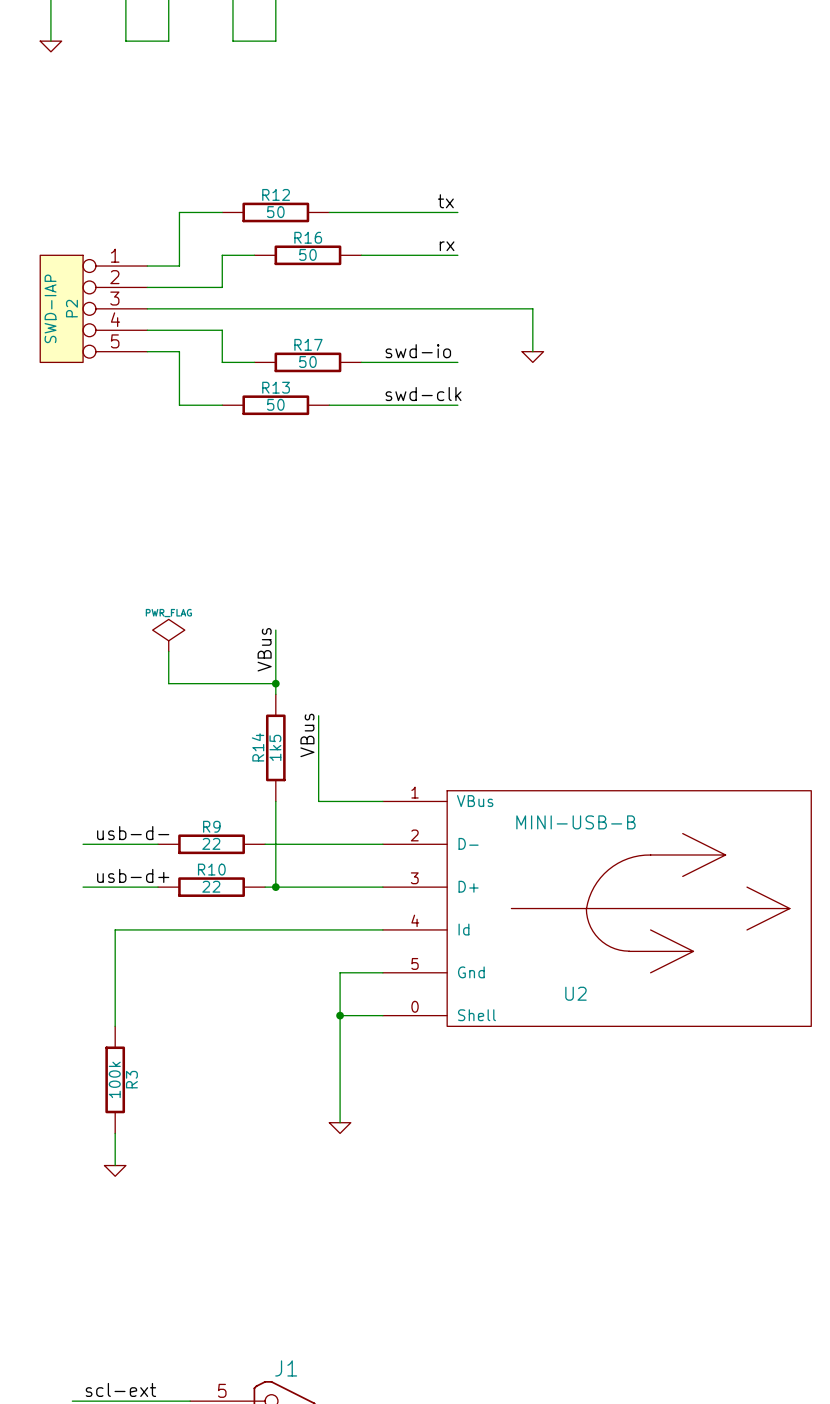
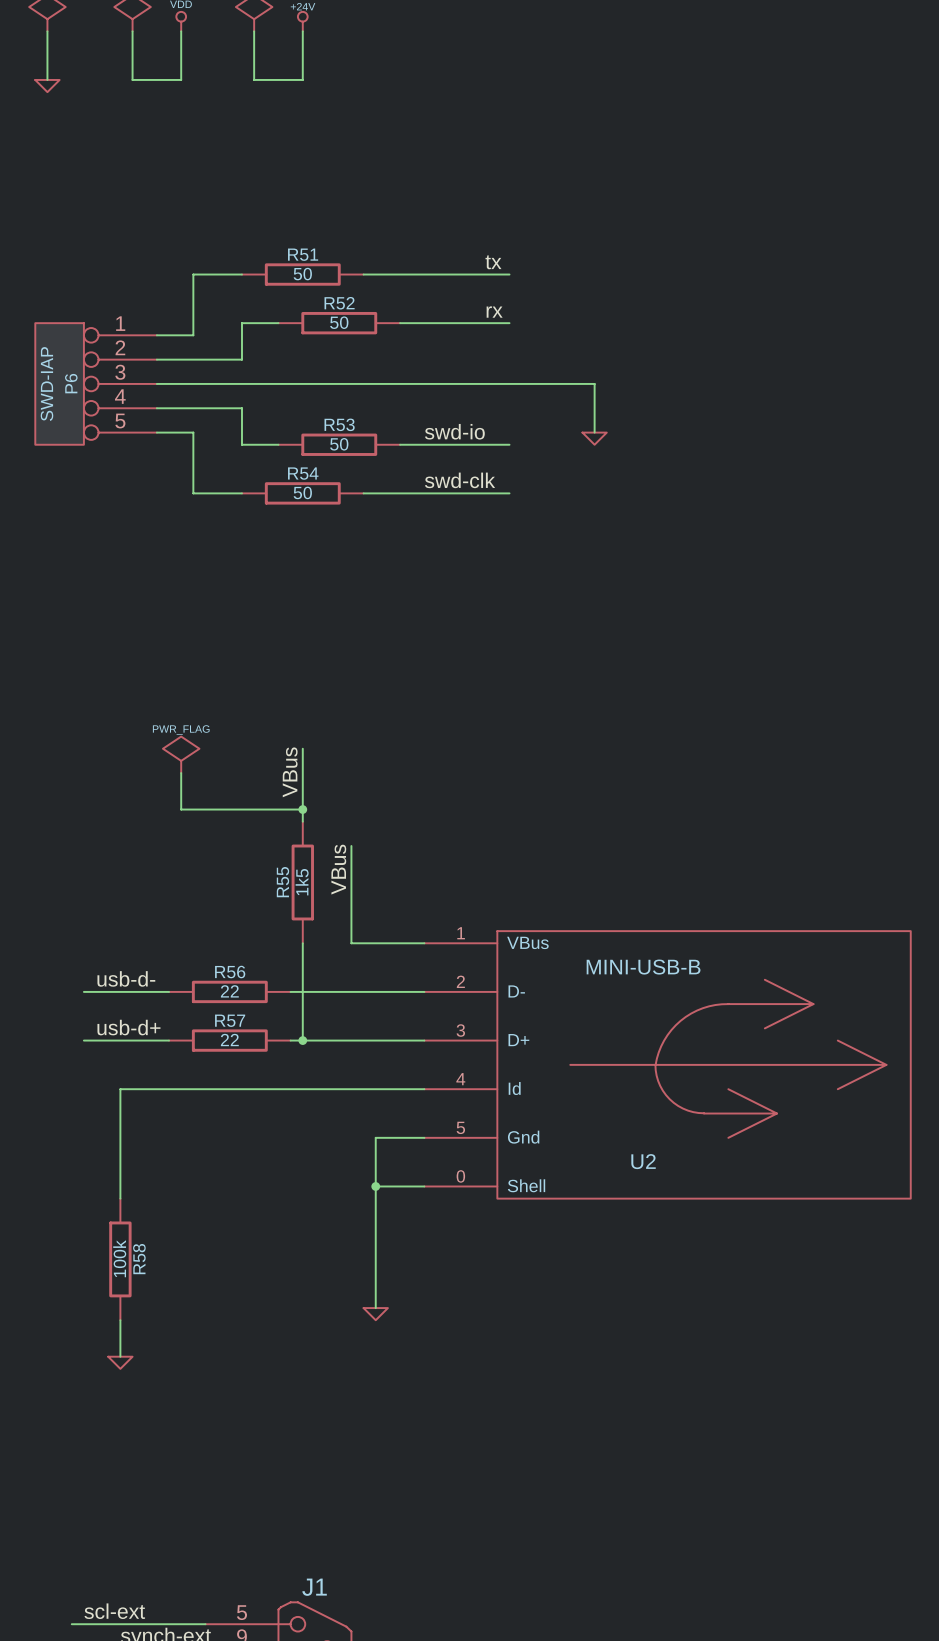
R12 name: R12 (276, 194) -> R51 (303, 254)
R16 name: R16 (308, 237) -> R52 (339, 303)
P2 name: P2 (71, 308) -> P6 (71, 383)
R17 name: R17 (308, 344) -> R53 (339, 424)
R13 name: R13 (276, 387) -> R54 (303, 473)
R14 name: R14 (258, 747) -> R55 (282, 882)
R9 name: R9 (211, 826) -> R56 (230, 972)
R10 name: R10 (211, 869) -> R57 (230, 1020)
R3 name: R3 (131, 1079) -> R58 (139, 1259)

